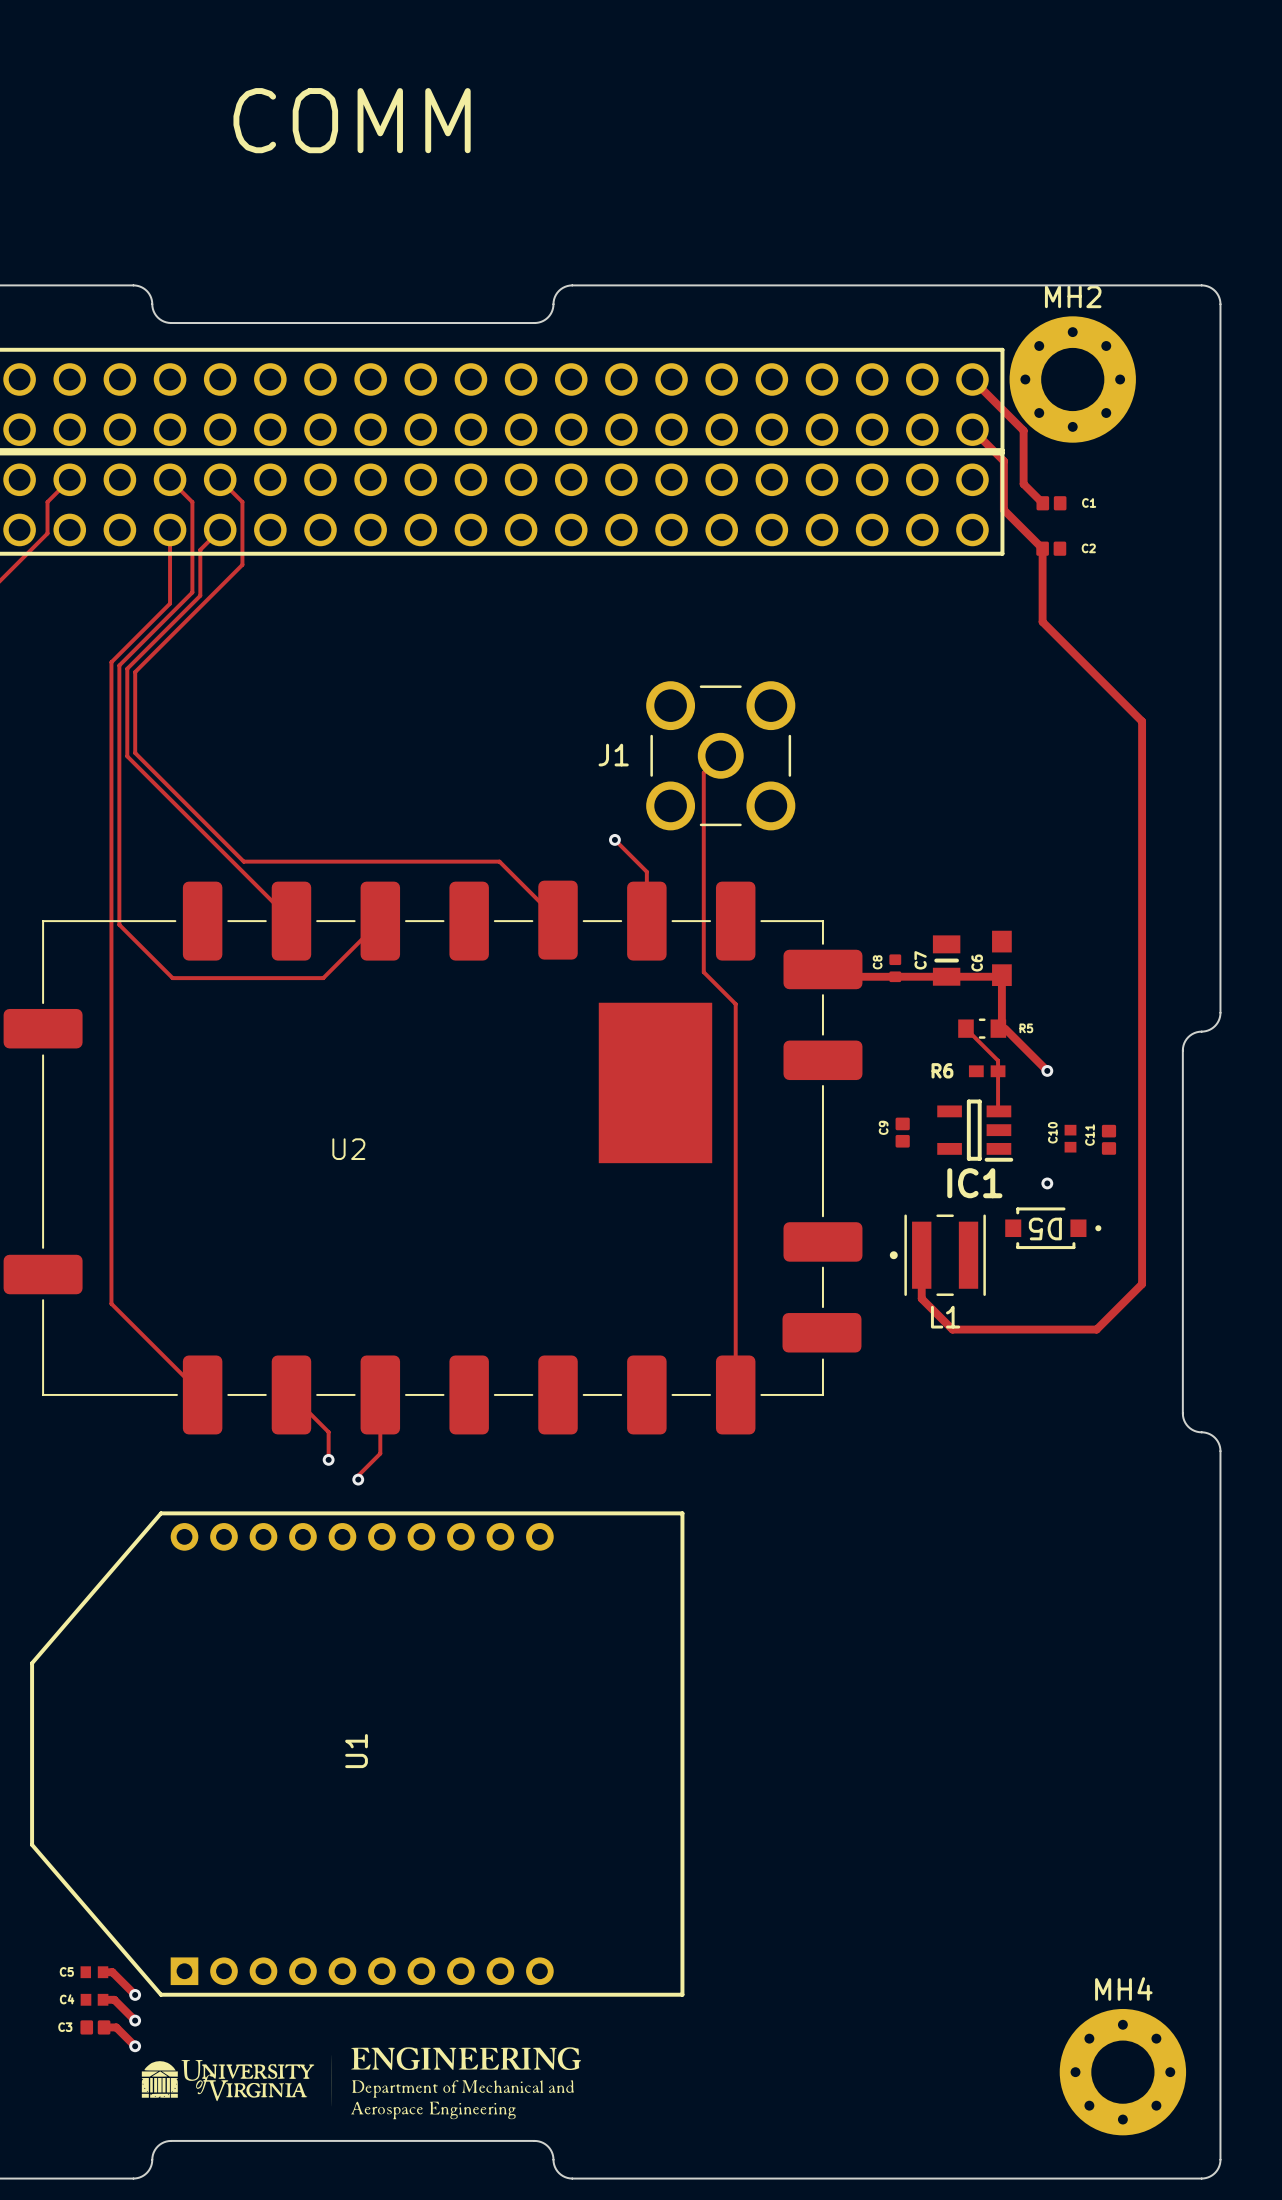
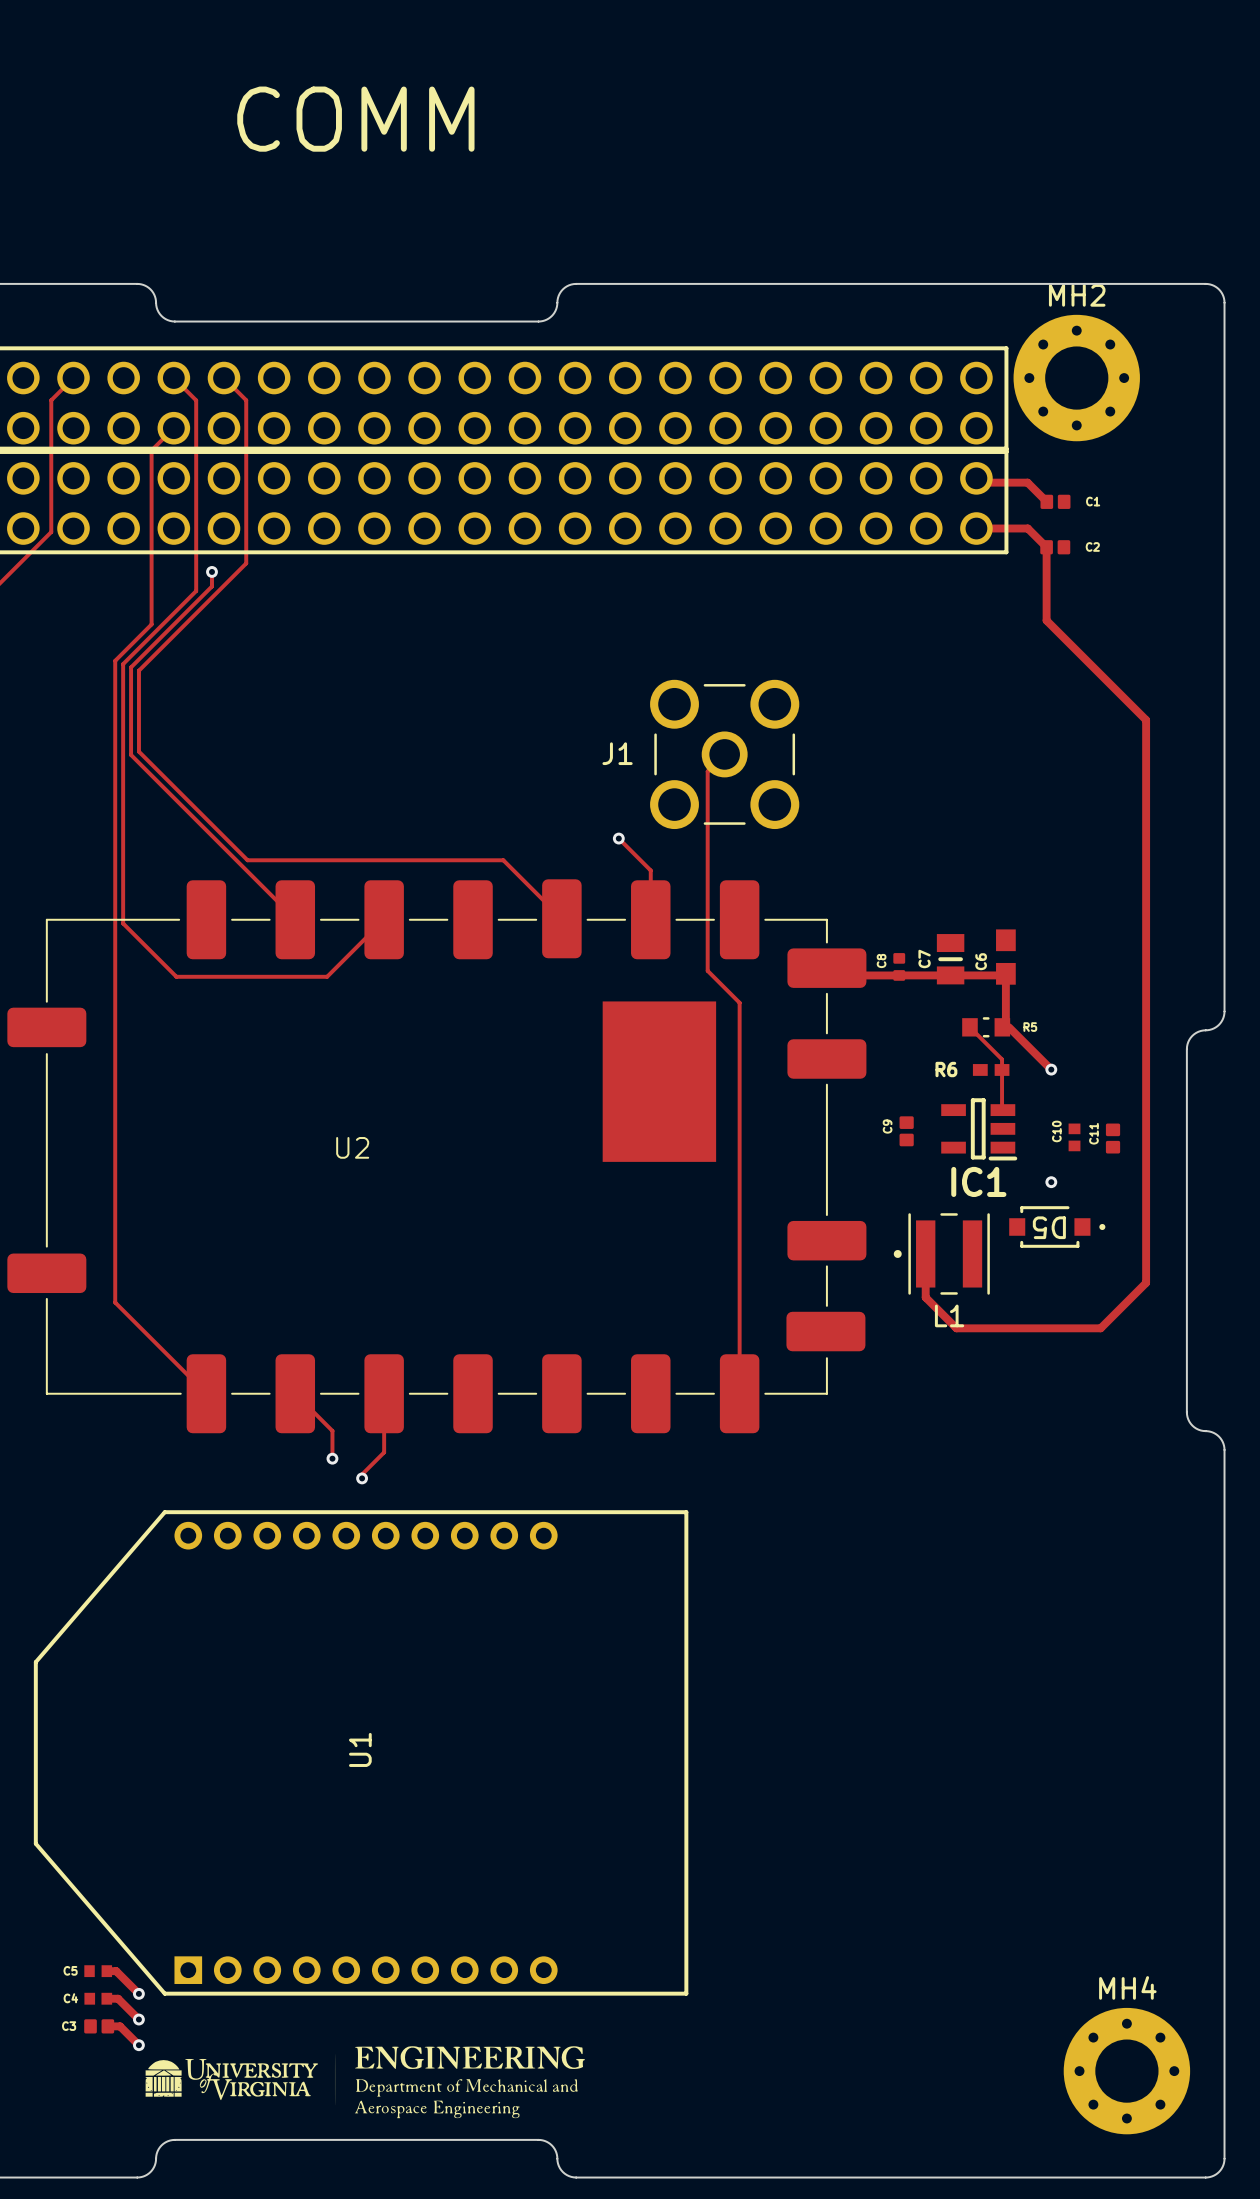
track: (972, 379) (1023, 430) (1023, 484) -> (976, 478) (980, 482) (1027, 482)
track: (972, 429) (1003, 461) (1003, 509) (1023, 529) -> (976, 528) (1027, 528)
track: (69, 479) (47, 502) -> (73, 378) (51, 400) (51, 500)
track: (170, 479) (192, 502) -> (173, 378) (196, 400) (196, 500)
track: (220, 479) (242, 502) -> (224, 378) (246, 400) (246, 500)
track: (170, 529) (170, 603) (147, 625) -> (173, 428) (151, 450) (151, 624)
track: (220, 529) (200, 549) (200, 595) -> (211, 571) (211, 586) (204, 594)
via: none -> (211, 571)

